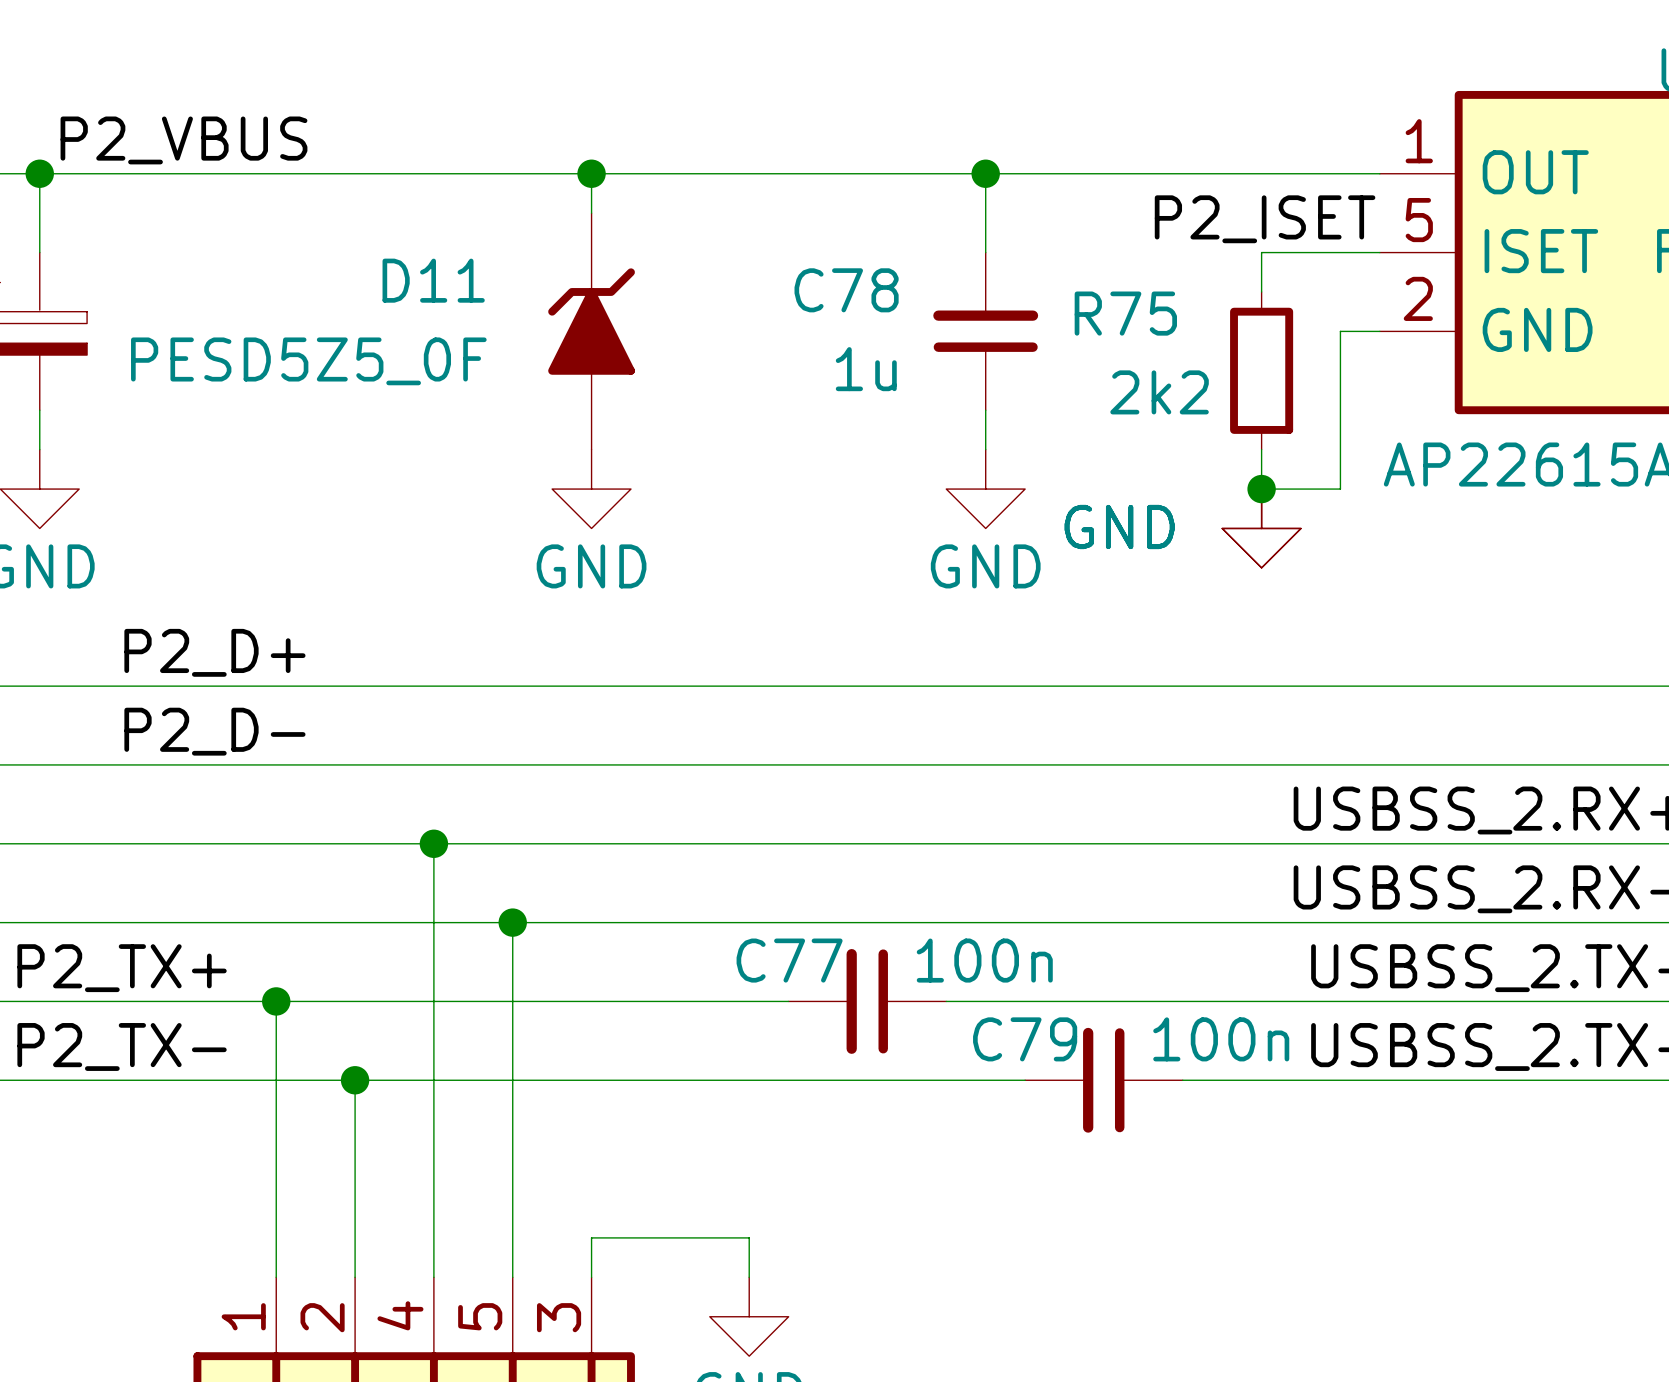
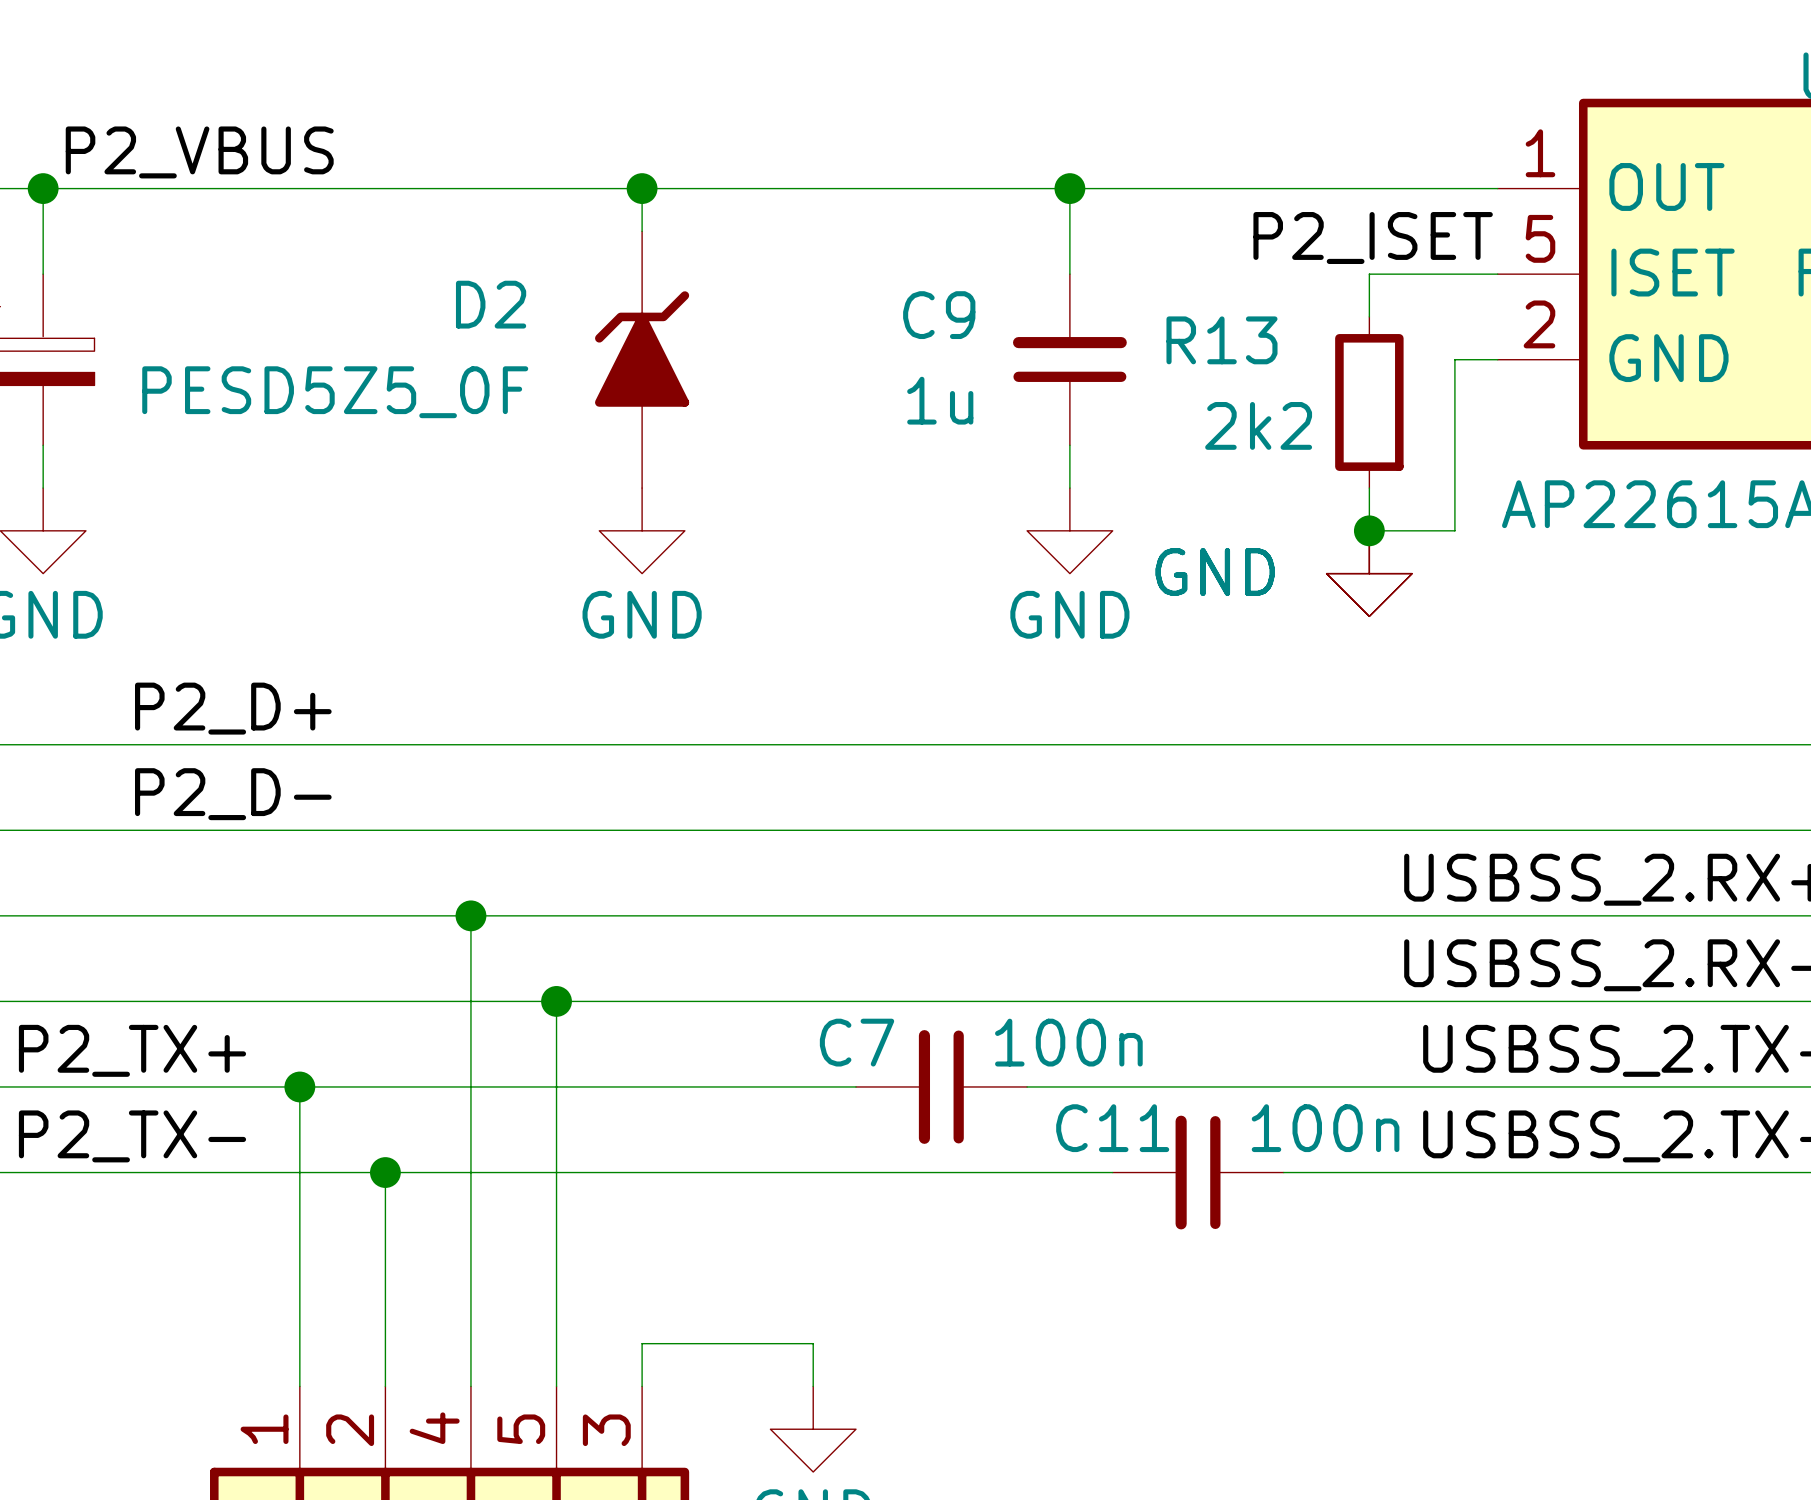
D11 name: D11 (433, 280) -> D2 (491, 304)
C78 name: C78 (846, 290) -> C9 (939, 315)
R75 name: R75 (1125, 313) -> R13 (1221, 340)
C77 name: C77 (789, 960) -> C7 (857, 1042)
C79 name: C79 (1025, 1039) -> C11 (1112, 1128)

